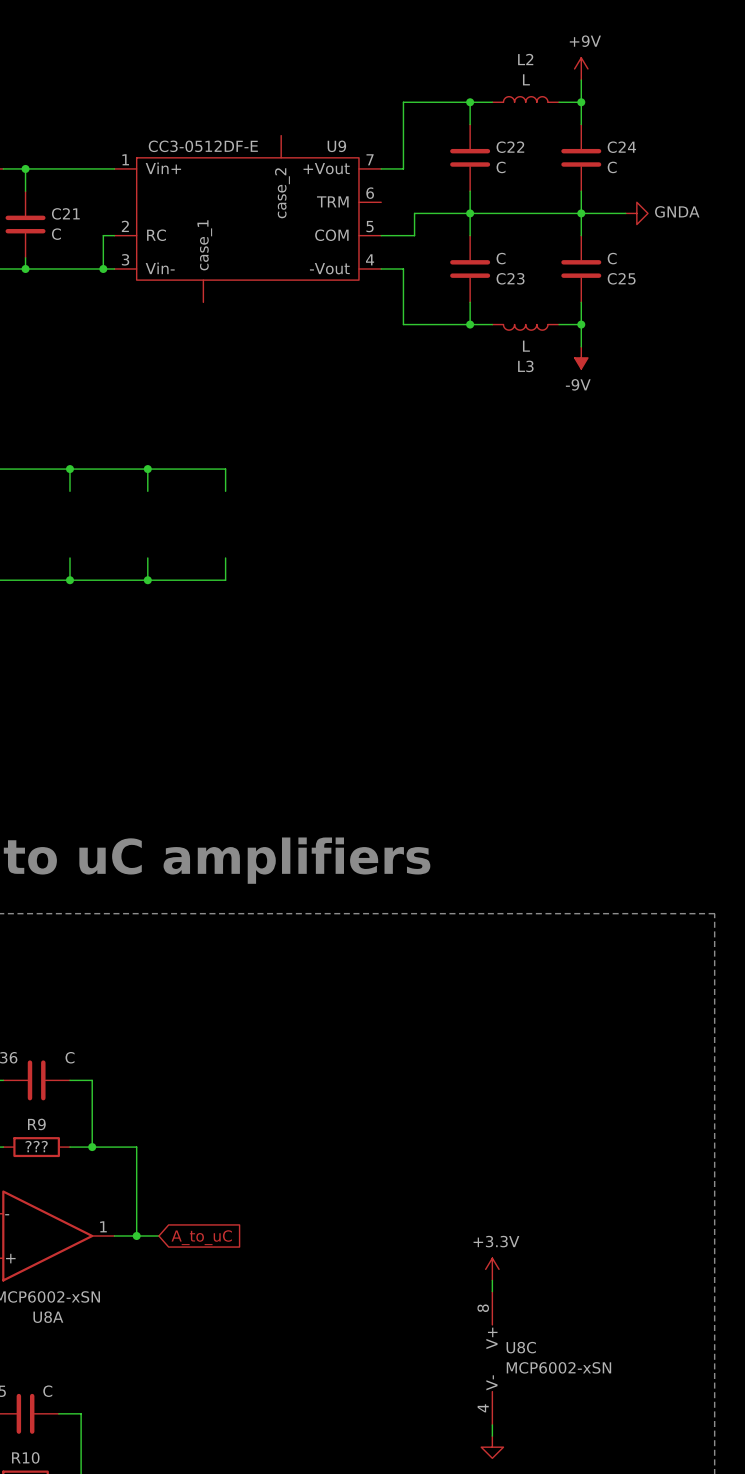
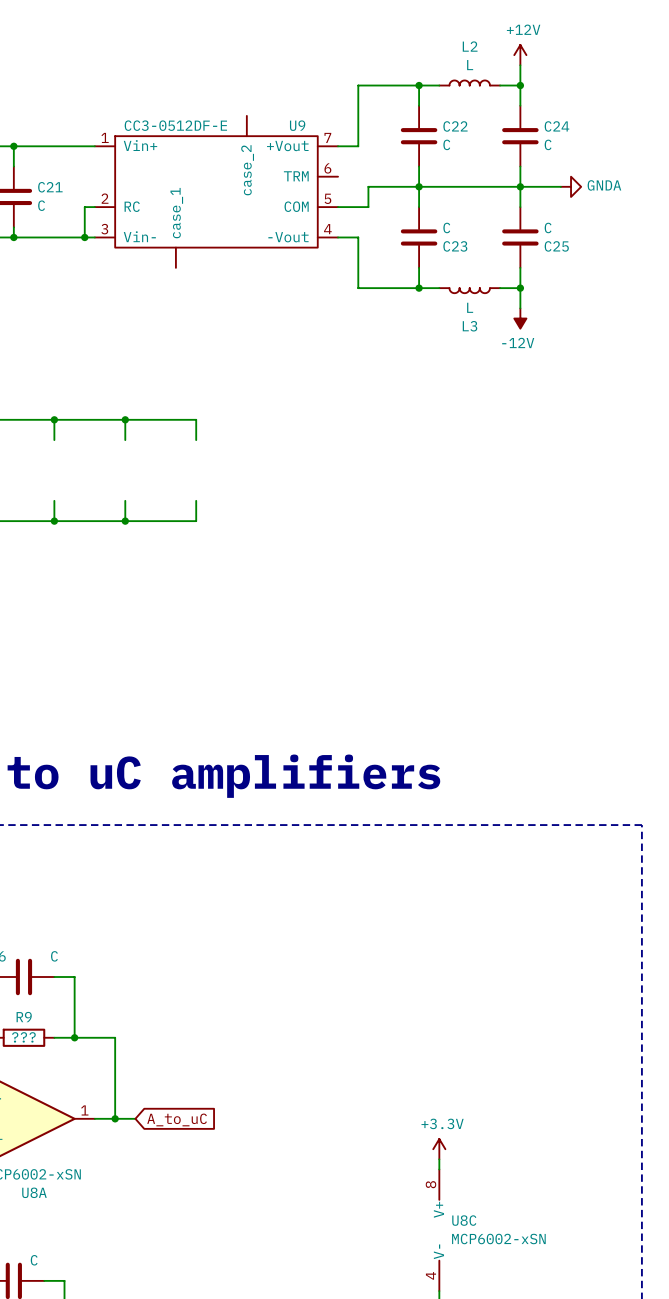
power symbol: +9V (581, 68) -> +12V (520, 55)
power symbol: -9V (581, 357) -> -12V (520, 318)

